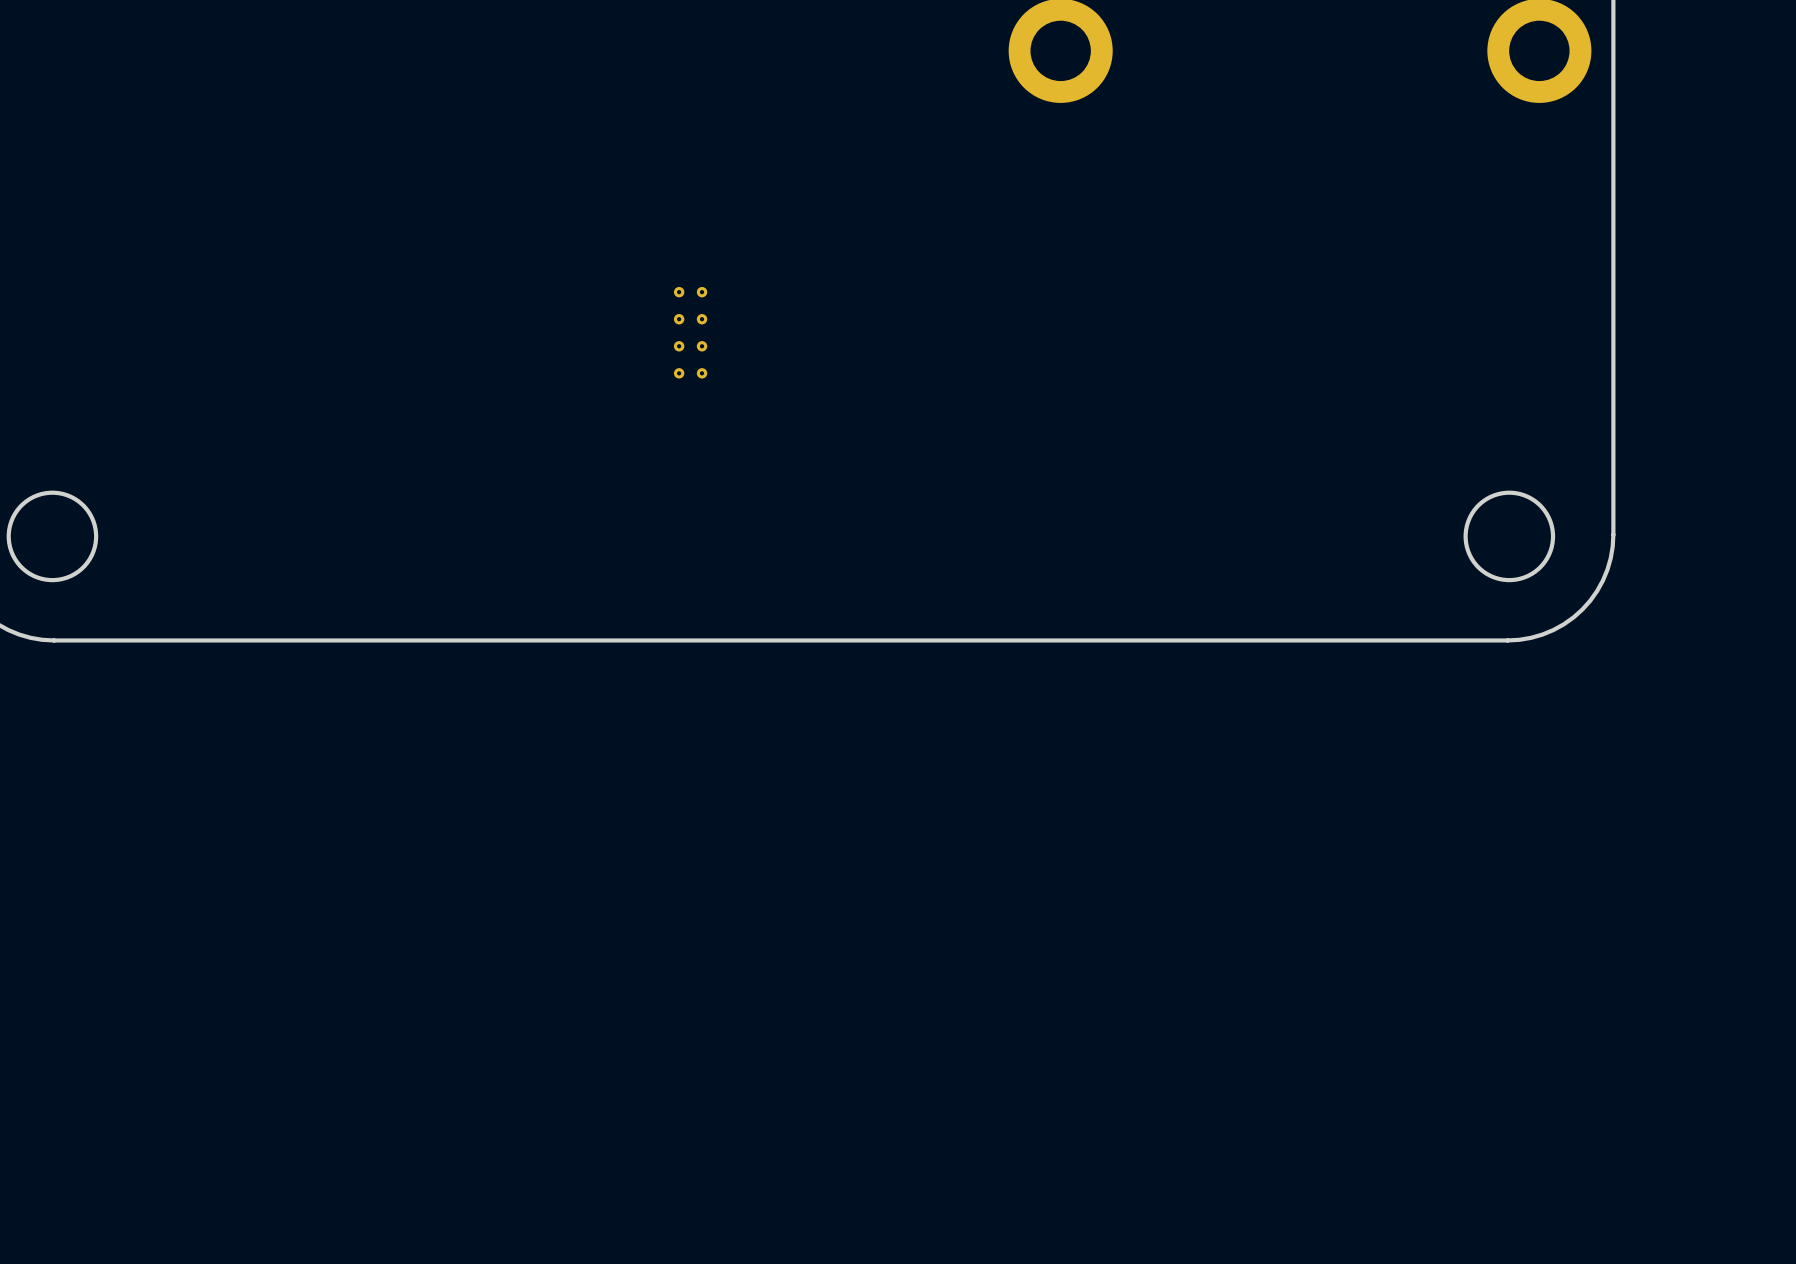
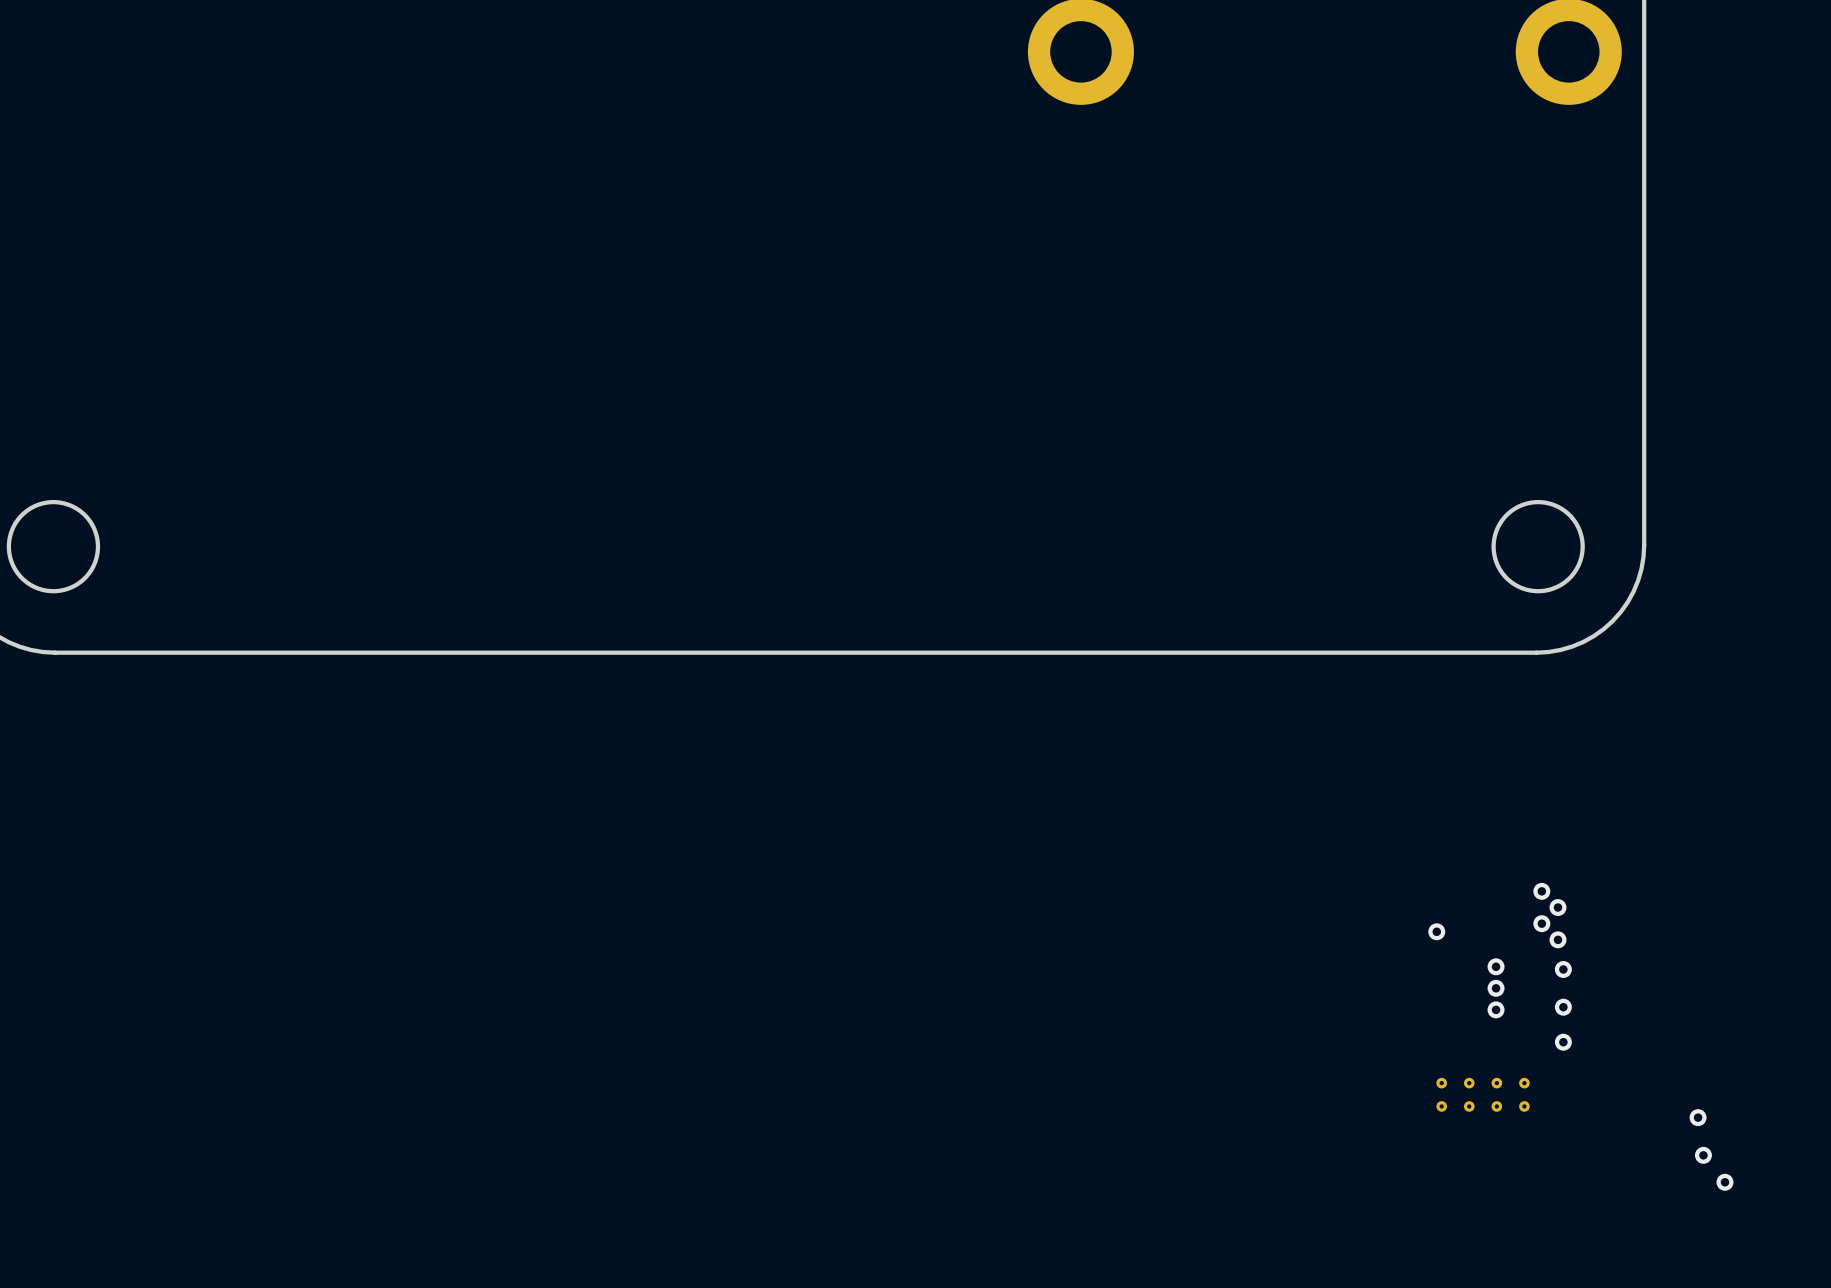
part: (690, 332) -> none
via: none -> (1541, 891)
via: none -> (1558, 907)
via: none -> (1541, 923)
via: none -> (1436, 931)
via: none -> (1558, 939)
via: none -> (1496, 966)
via: none -> (1563, 969)
via: none -> (1496, 988)
via: none -> (1563, 1007)
via: none -> (1496, 1009)
via: none -> (1563, 1042)
part: none -> (1483, 1094)
via: none -> (1698, 1117)
via: none -> (1703, 1155)
via: none -> (1725, 1182)

